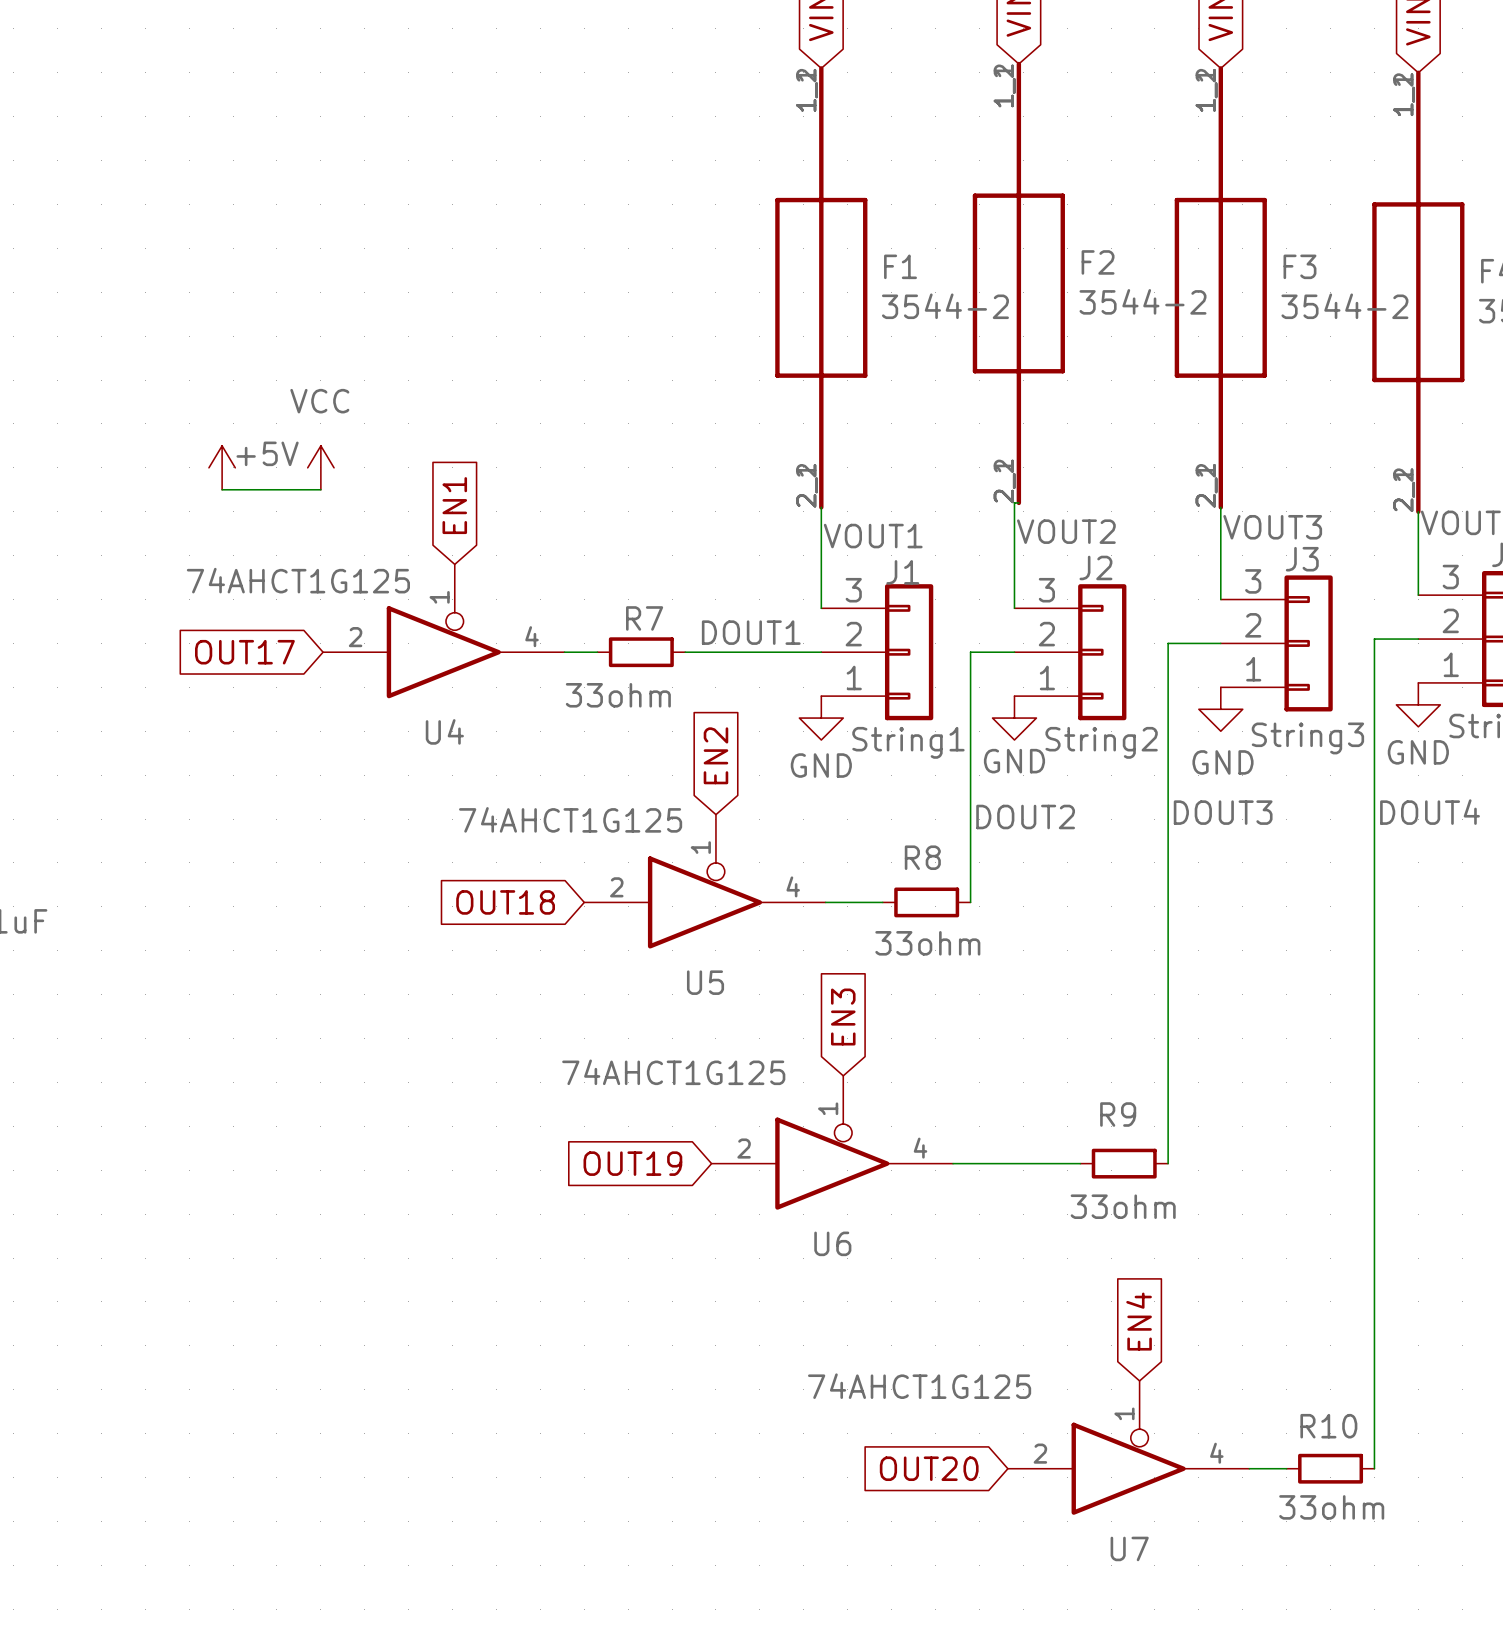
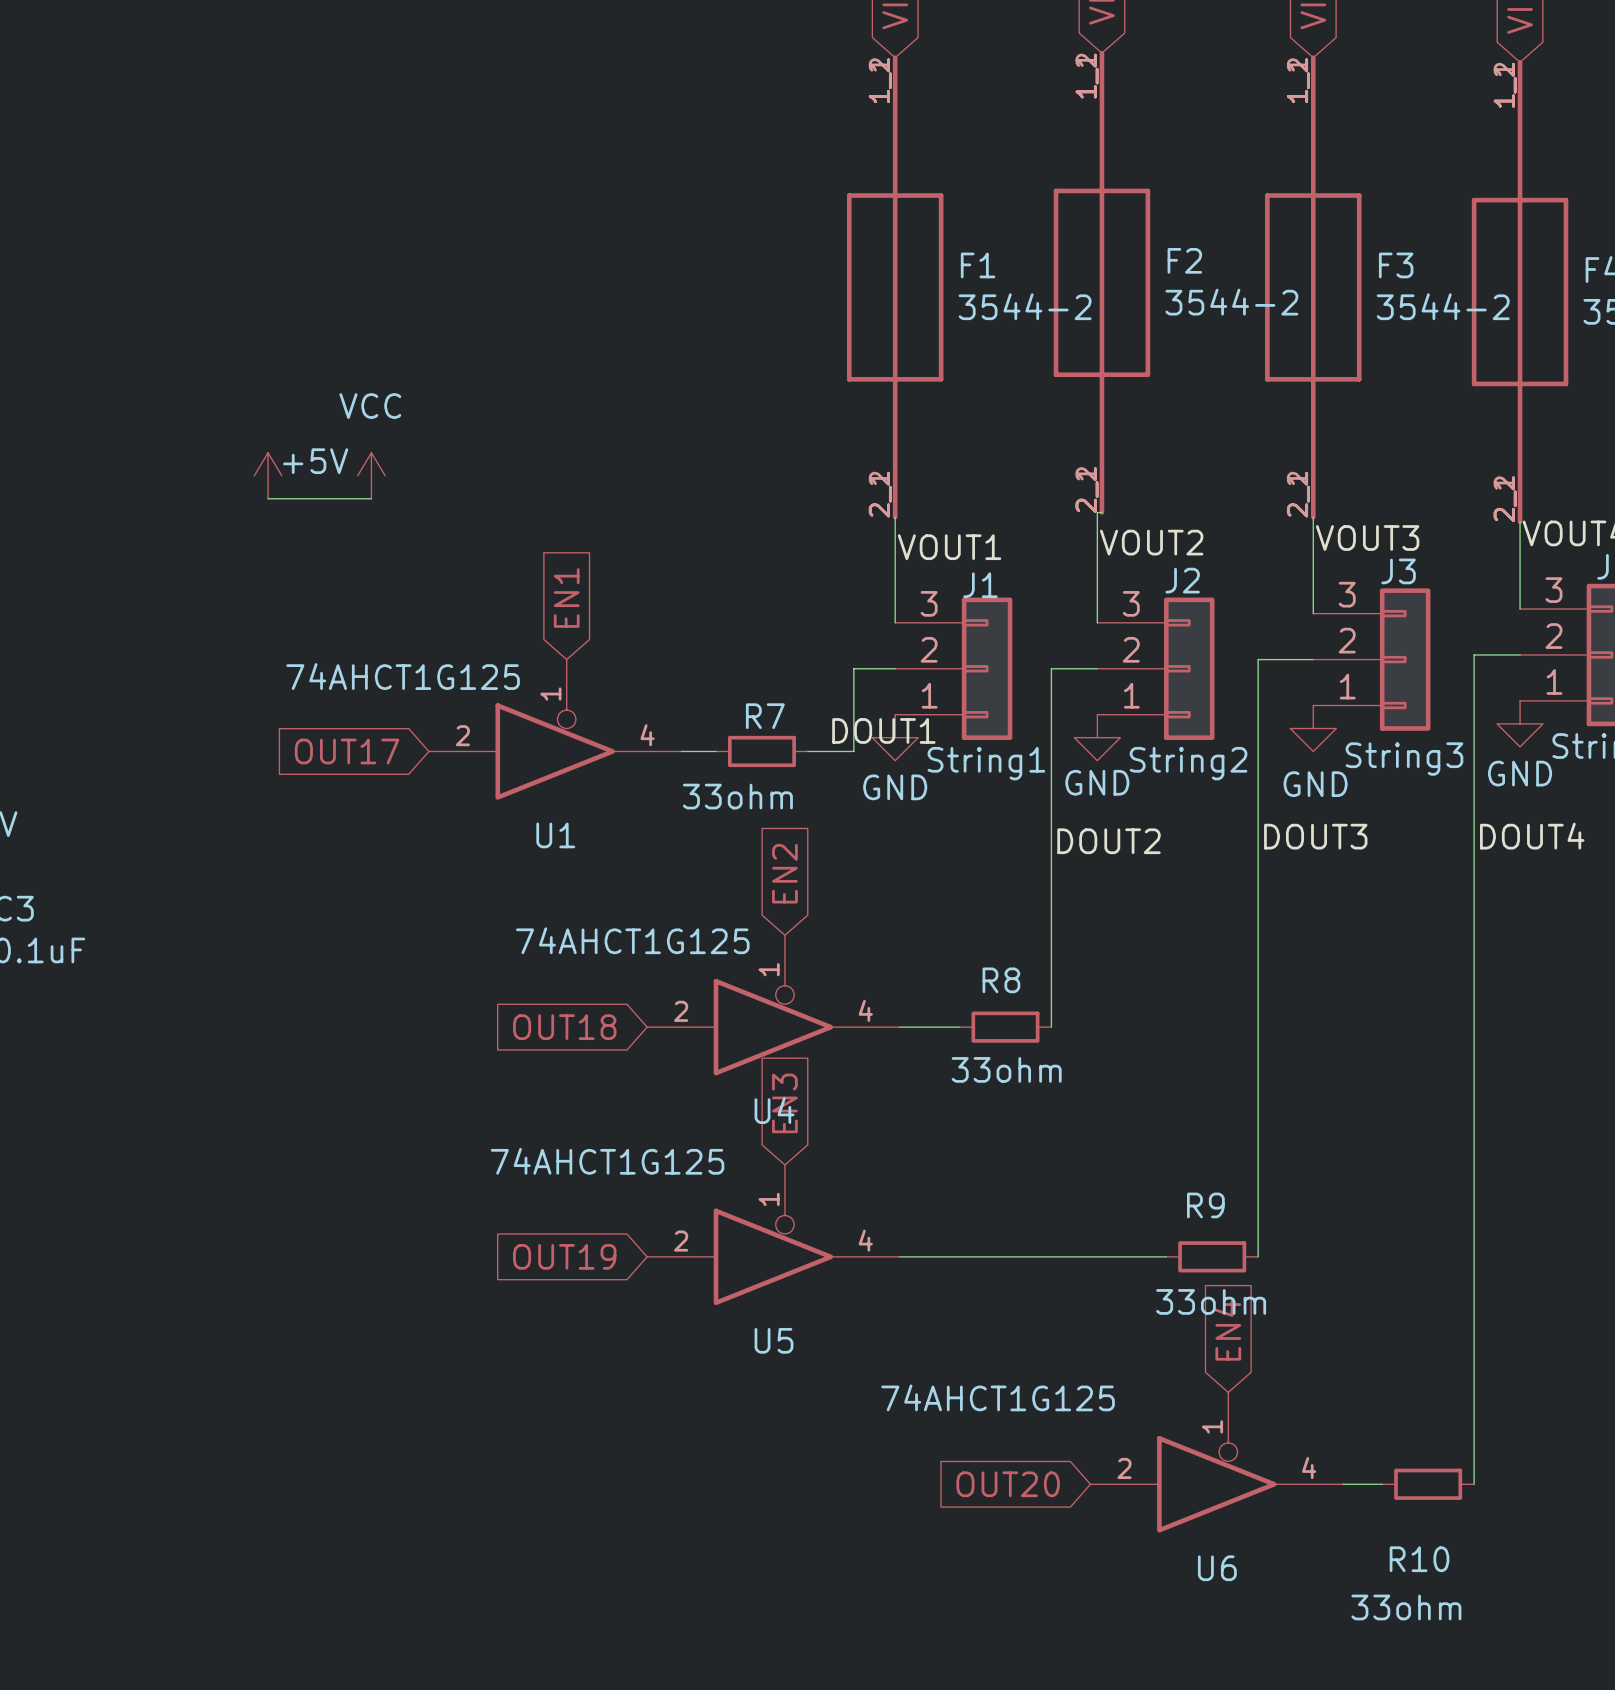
global label position: EN1 (454, 505) -> EN1 (566, 598)
U4 value position: 74AHCT1G125 (298, 580) -> 74AHCT1G125 (632, 940)
U4 position: (443, 631) -> (773, 1005)
label position: DOUT1 (751, 632) -> DOUT1 (883, 730)
global label position: OUT17 (244, 652) -> OUT17 (347, 751)
wire: (564, 652) (597, 652) -> (681, 751) (716, 751)
R7 position: (641, 652) -> (761, 751)
wire: (685, 652) (781, 652) -> (807, 751) (853, 751) (853, 668)
U1: none -> 74AHCT1G125 (555, 729)
global label position: EN2 (715, 755) -> EN2 (784, 873)
U5 value position: 74AHCT1G125 (570, 819) -> 74AHCT1G125 (607, 1161)
U5 position: (704, 881) -> (773, 1235)
global label position: OUT18 (505, 902) -> OUT18 (564, 1027)
wire: (825, 902) (882, 902) -> (899, 1027) (959, 1027)
R8 position: (926, 902) -> (1005, 1027)
wire: none -> (1051, 930) (1051, 1027)
global label position: EN3 (843, 1017) -> EN3 (784, 1103)
U6 value position: 74AHCT1G125 (673, 1072) -> 74AHCT1G125 (998, 1397)
U6 position: (832, 1142) -> (1216, 1462)
global label position: OUT19 (632, 1163) -> OUT19 (564, 1256)
wire: (953, 1163) (1080, 1163) -> none
R9 position: (1124, 1163) -> (1212, 1256)
wire: none -> (1258, 1204) (1258, 1256)
wire: none -> (899, 1256) (1166, 1256)
global label position: EN4 (1139, 1321) -> EN4 (1227, 1330)
R10 name position: R10 (1328, 1426) -> R10 (1419, 1559)
wire: (1374, 1431) (1374, 1468) -> none
U7: 74AHCT1G125 (1128, 1447) -> none
global label position: OUT20 (929, 1468) -> OUT20 (1008, 1484)
wire: (1249, 1468) (1286, 1468) -> (1343, 1484) (1382, 1484)
R10 position: (1330, 1468) -> (1428, 1484)
R10 value position: 33ohm (1331, 1507) -> 33ohm (1406, 1607)

